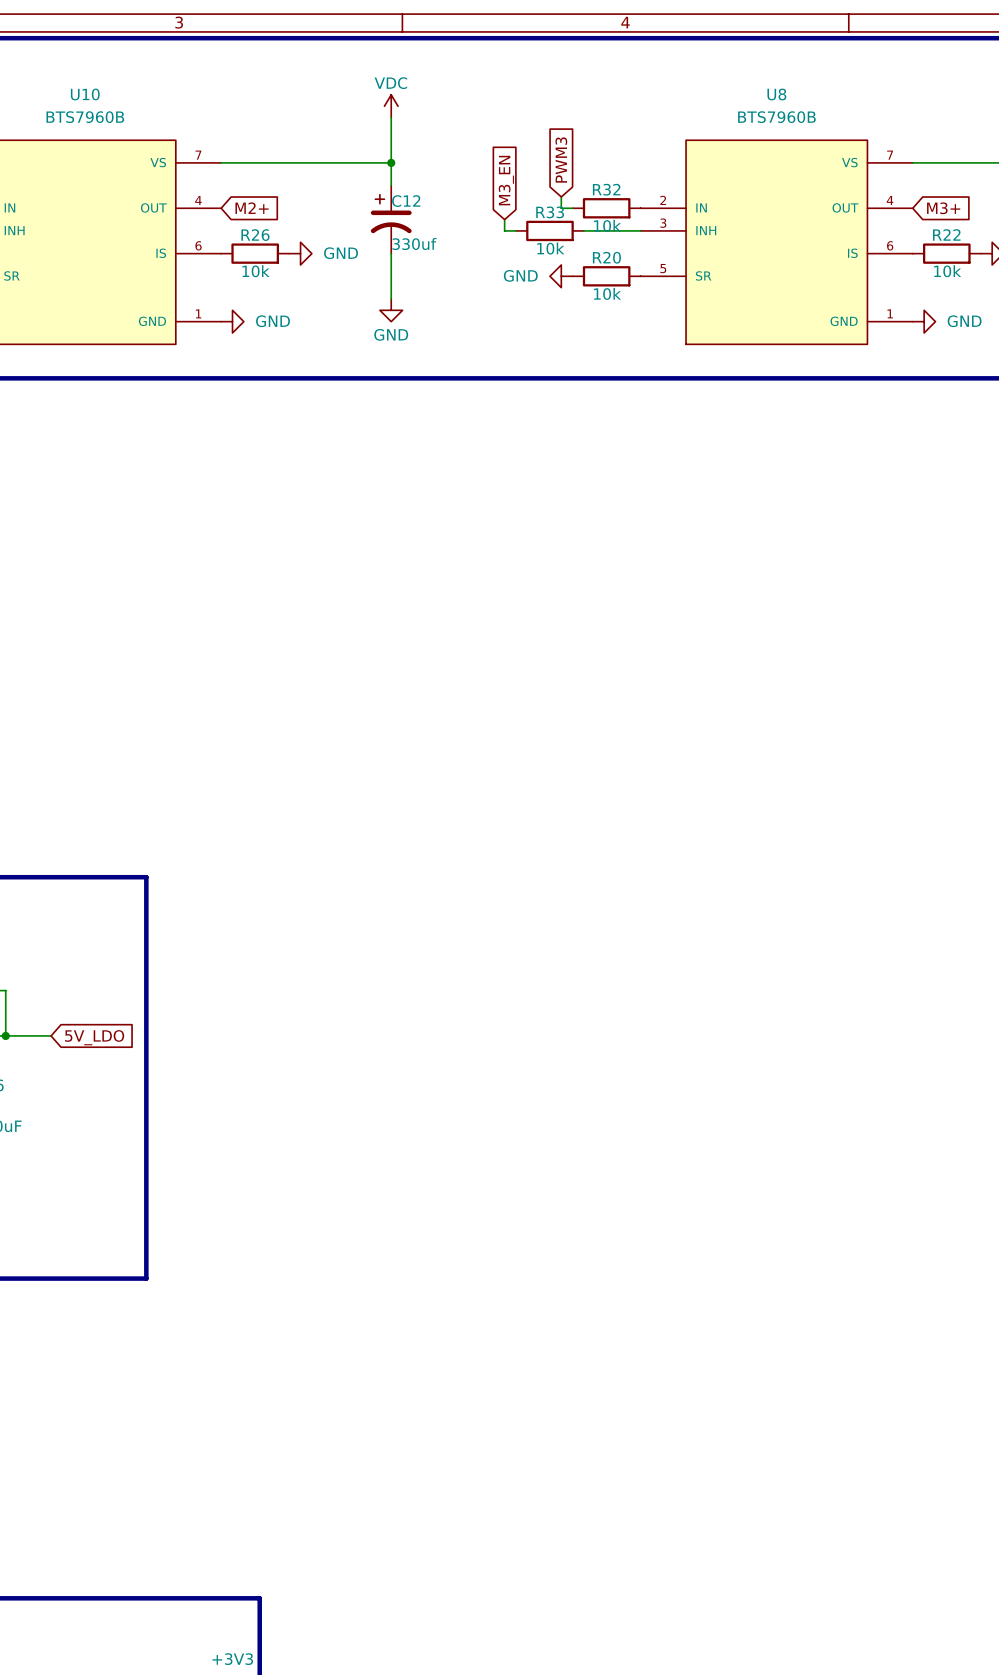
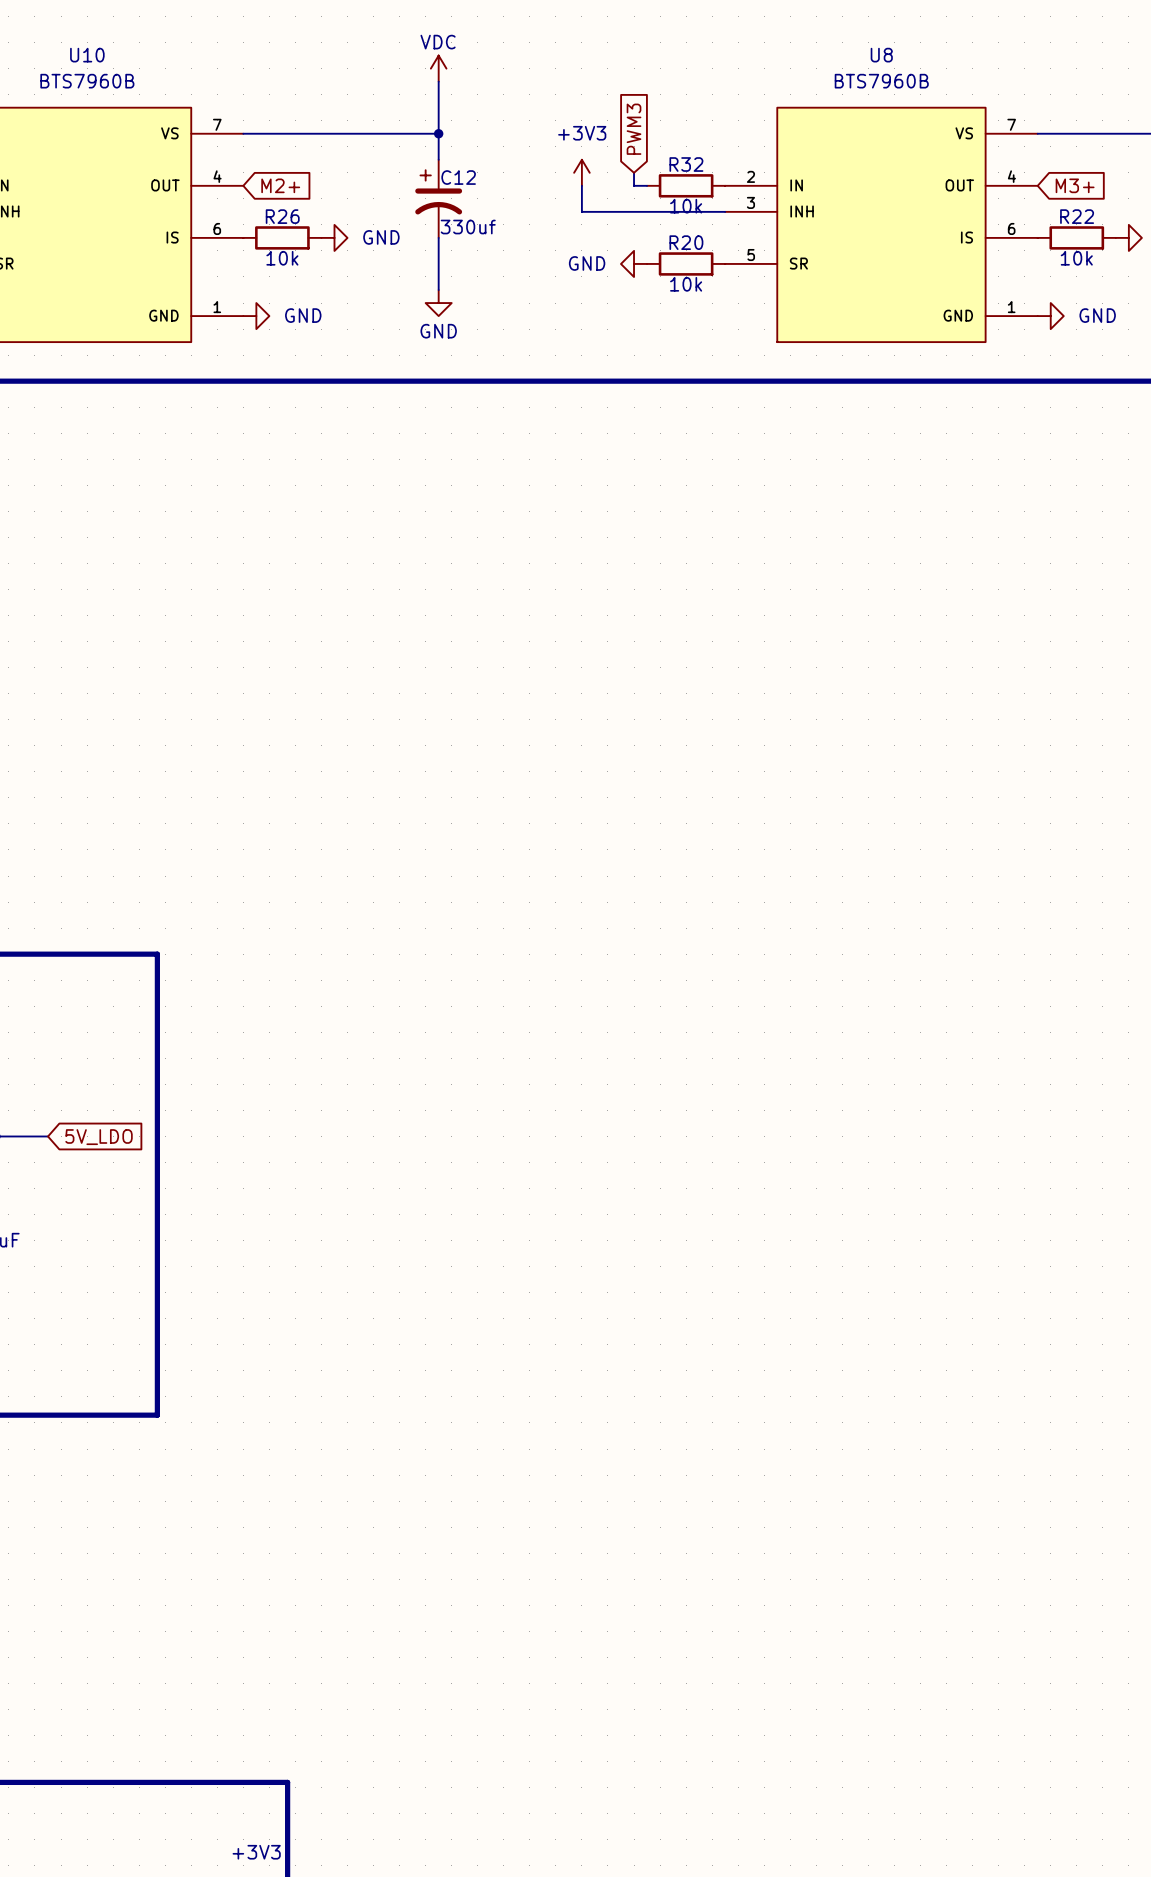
global label: M3_EN (506, 180) -> none
power symbol: none -> +3V3 (581, 172)
wire: none -> (581, 185) (581, 211) (660, 211)
wire: (504, 219) (504, 230) (515, 230) -> none
R33: 10k (549, 230) -> none

